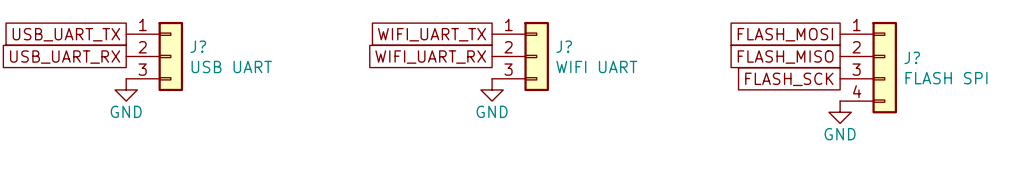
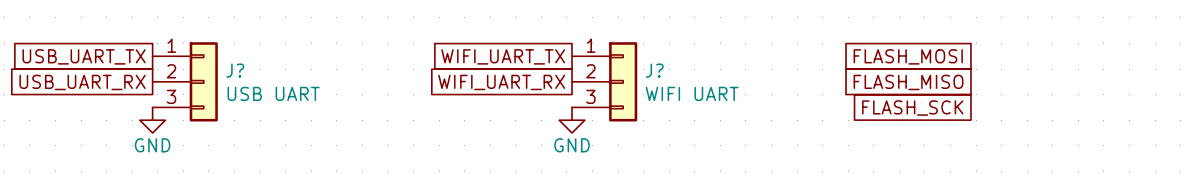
J?: FLASH SPI (868, 67) -> none
power symbol: GND (840, 112) -> none

